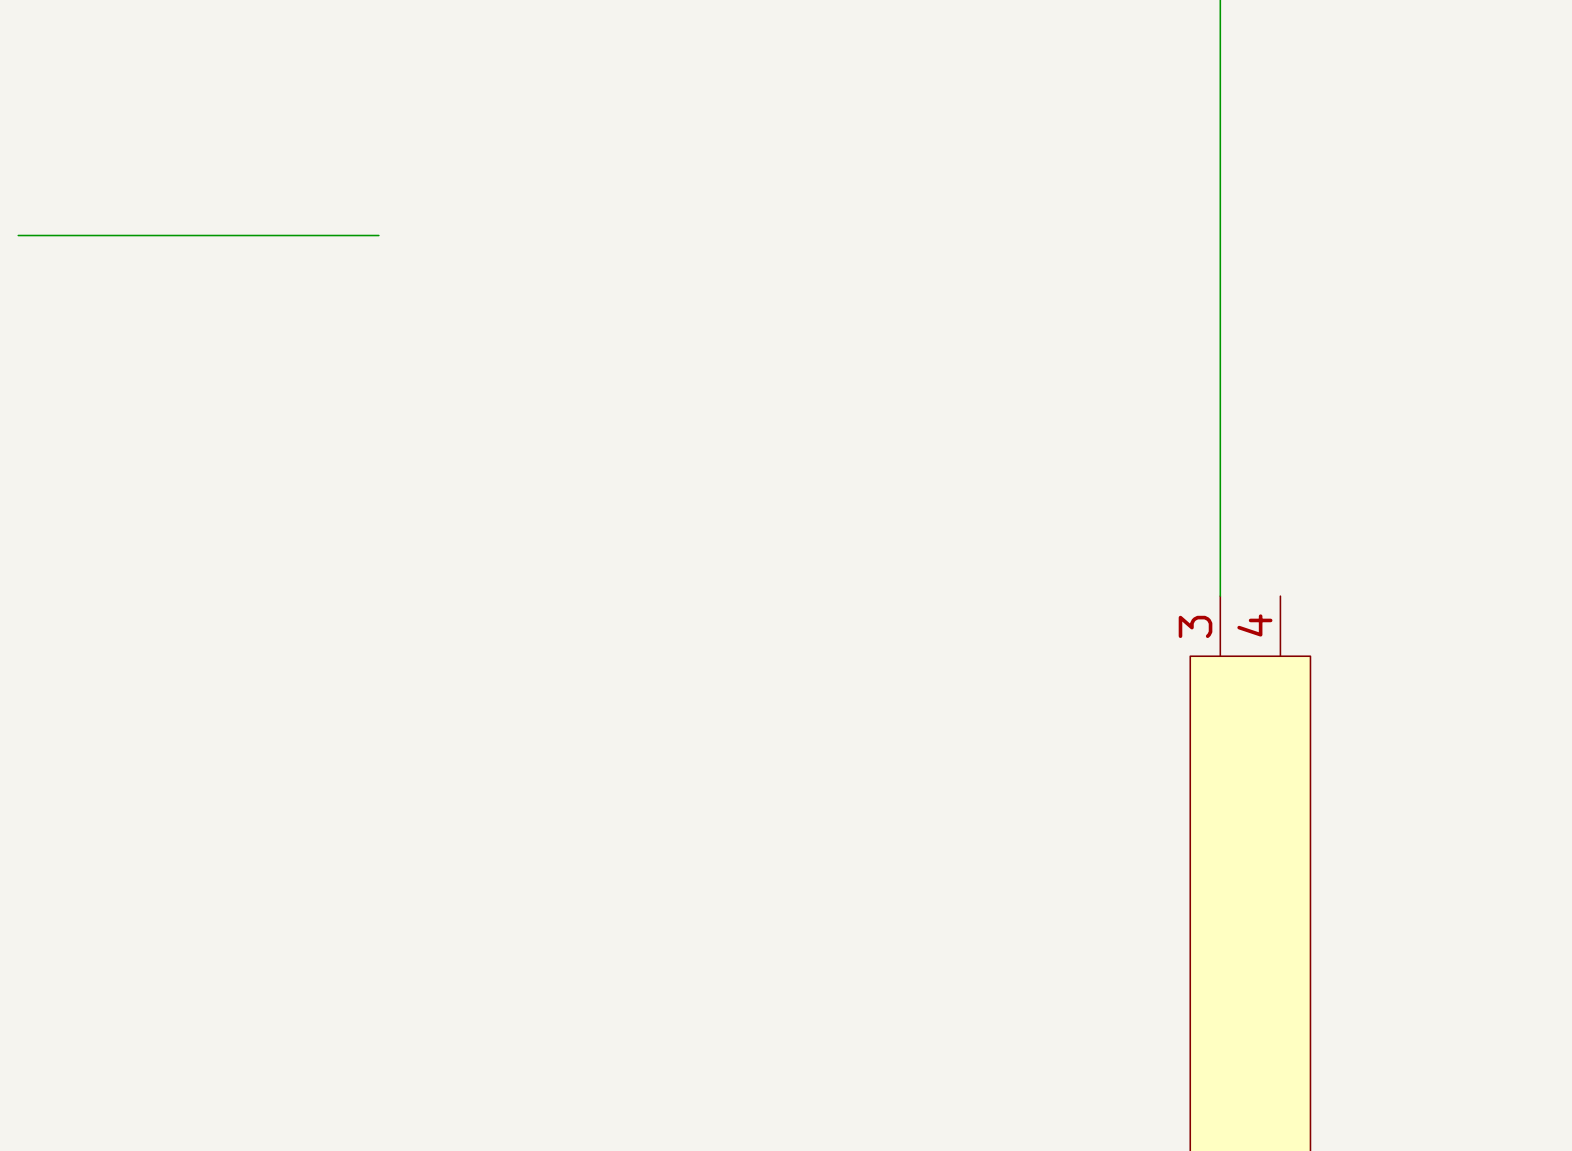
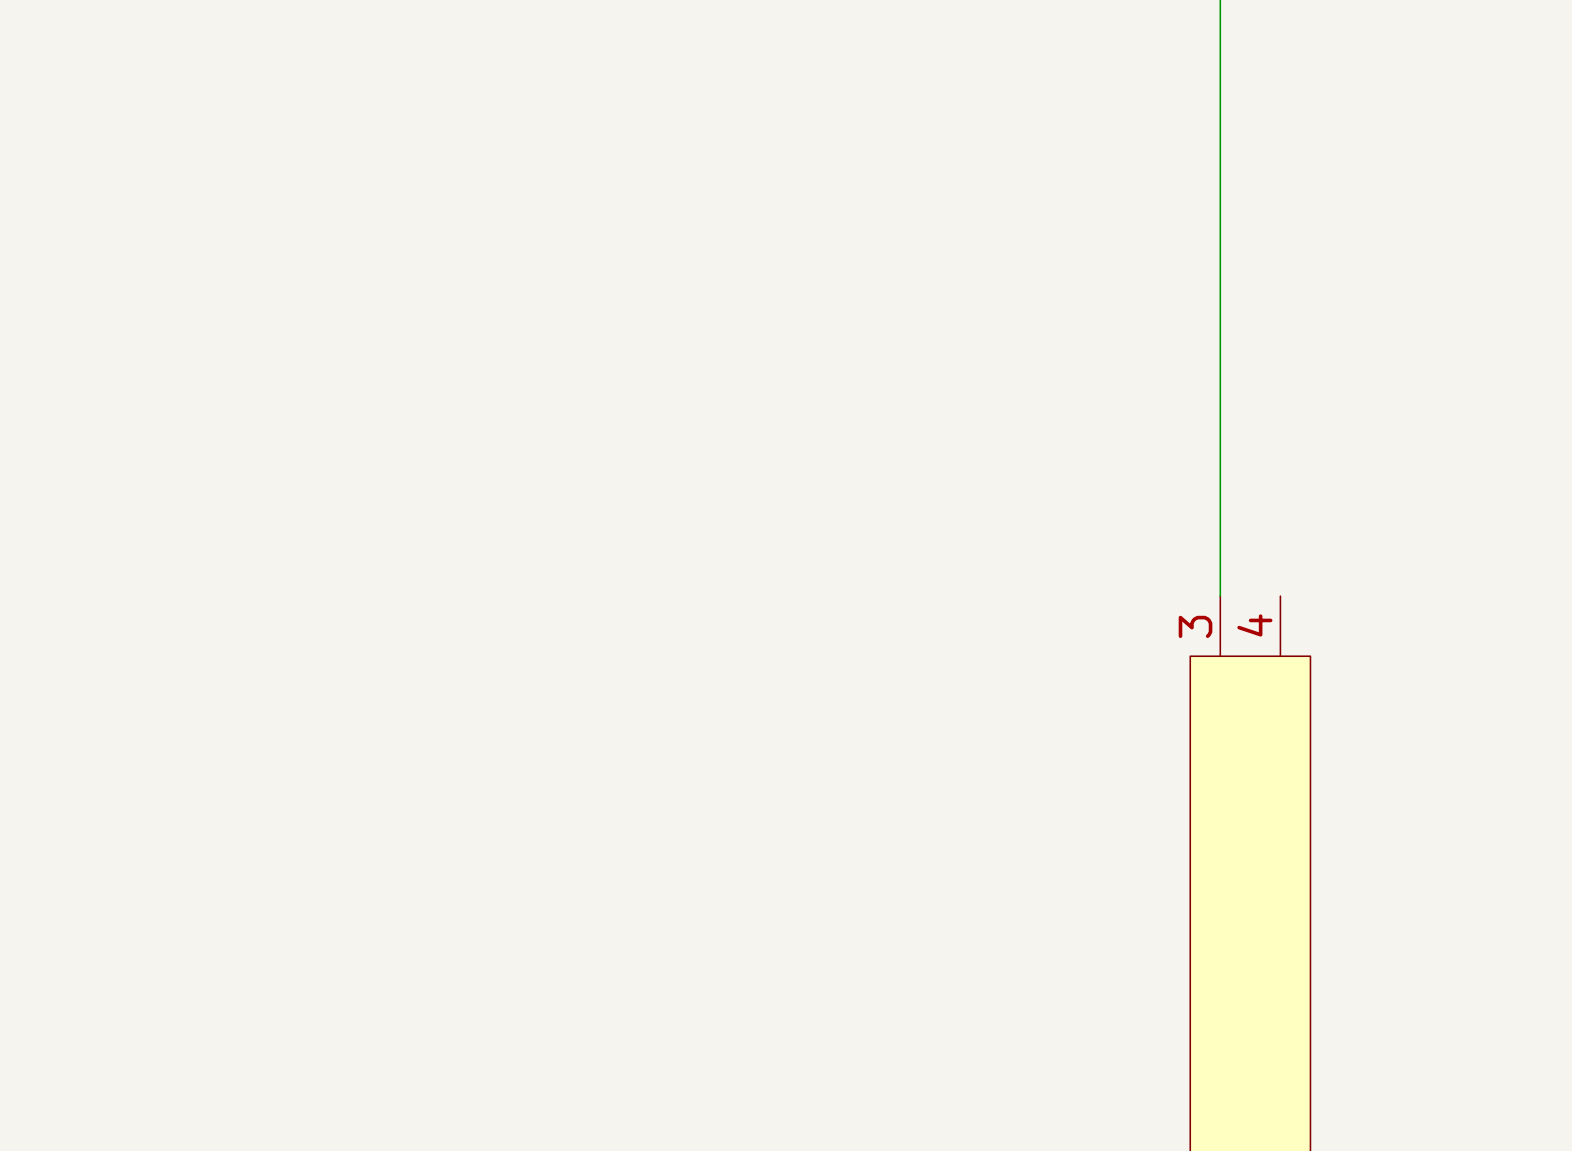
wire: (18, 235) (378, 235) -> none

